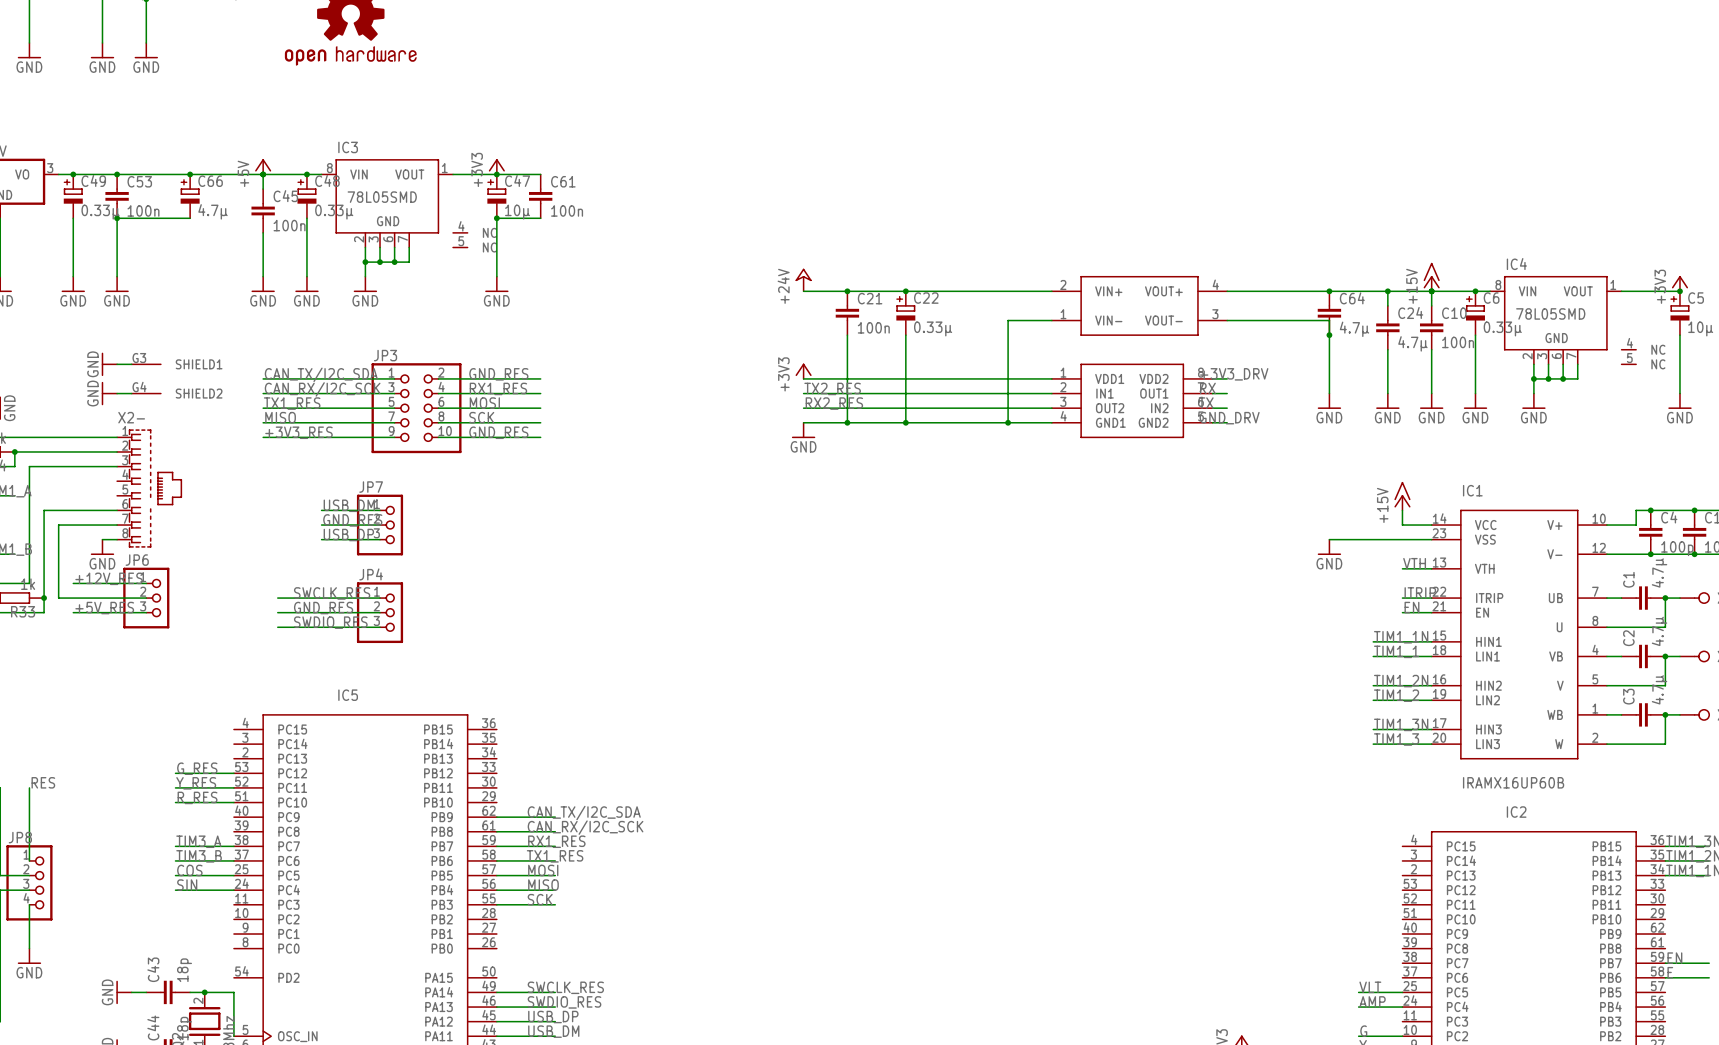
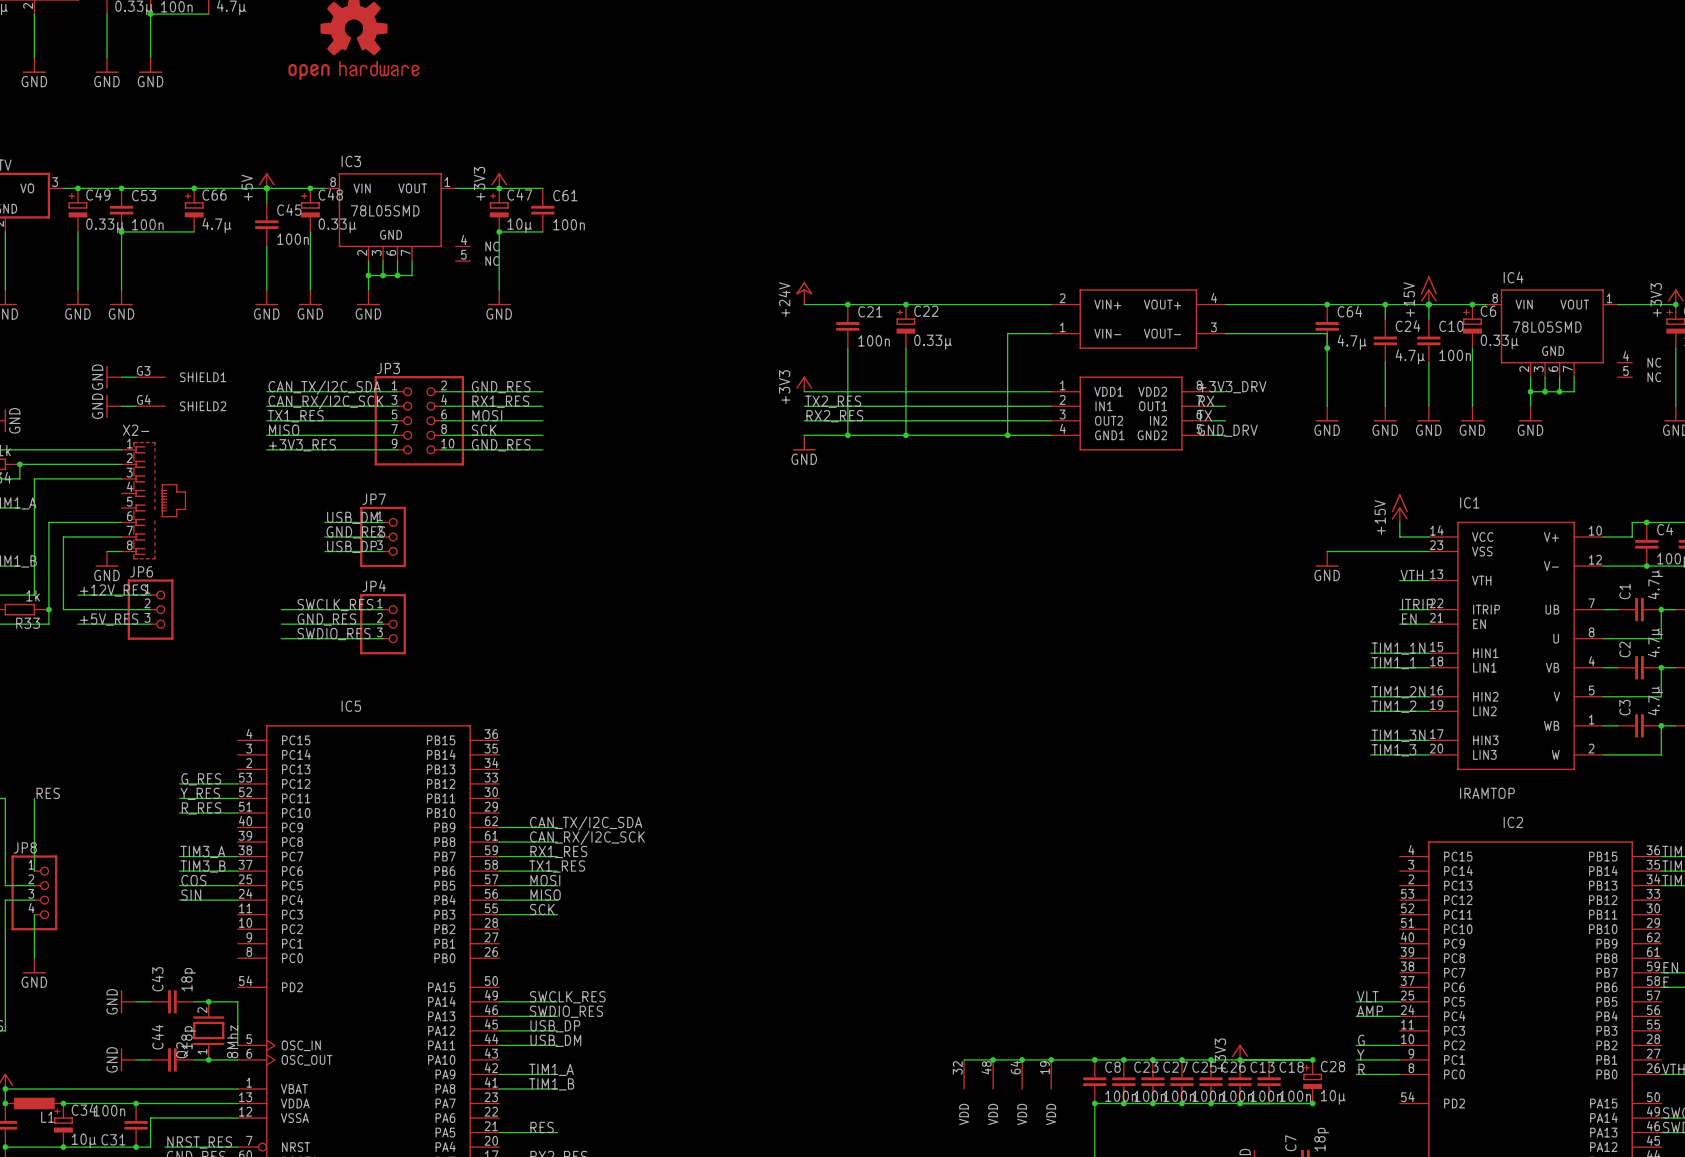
IC1 value: IRAMX16UP60B (1513, 782) -> IRAMTOP (1487, 793)

